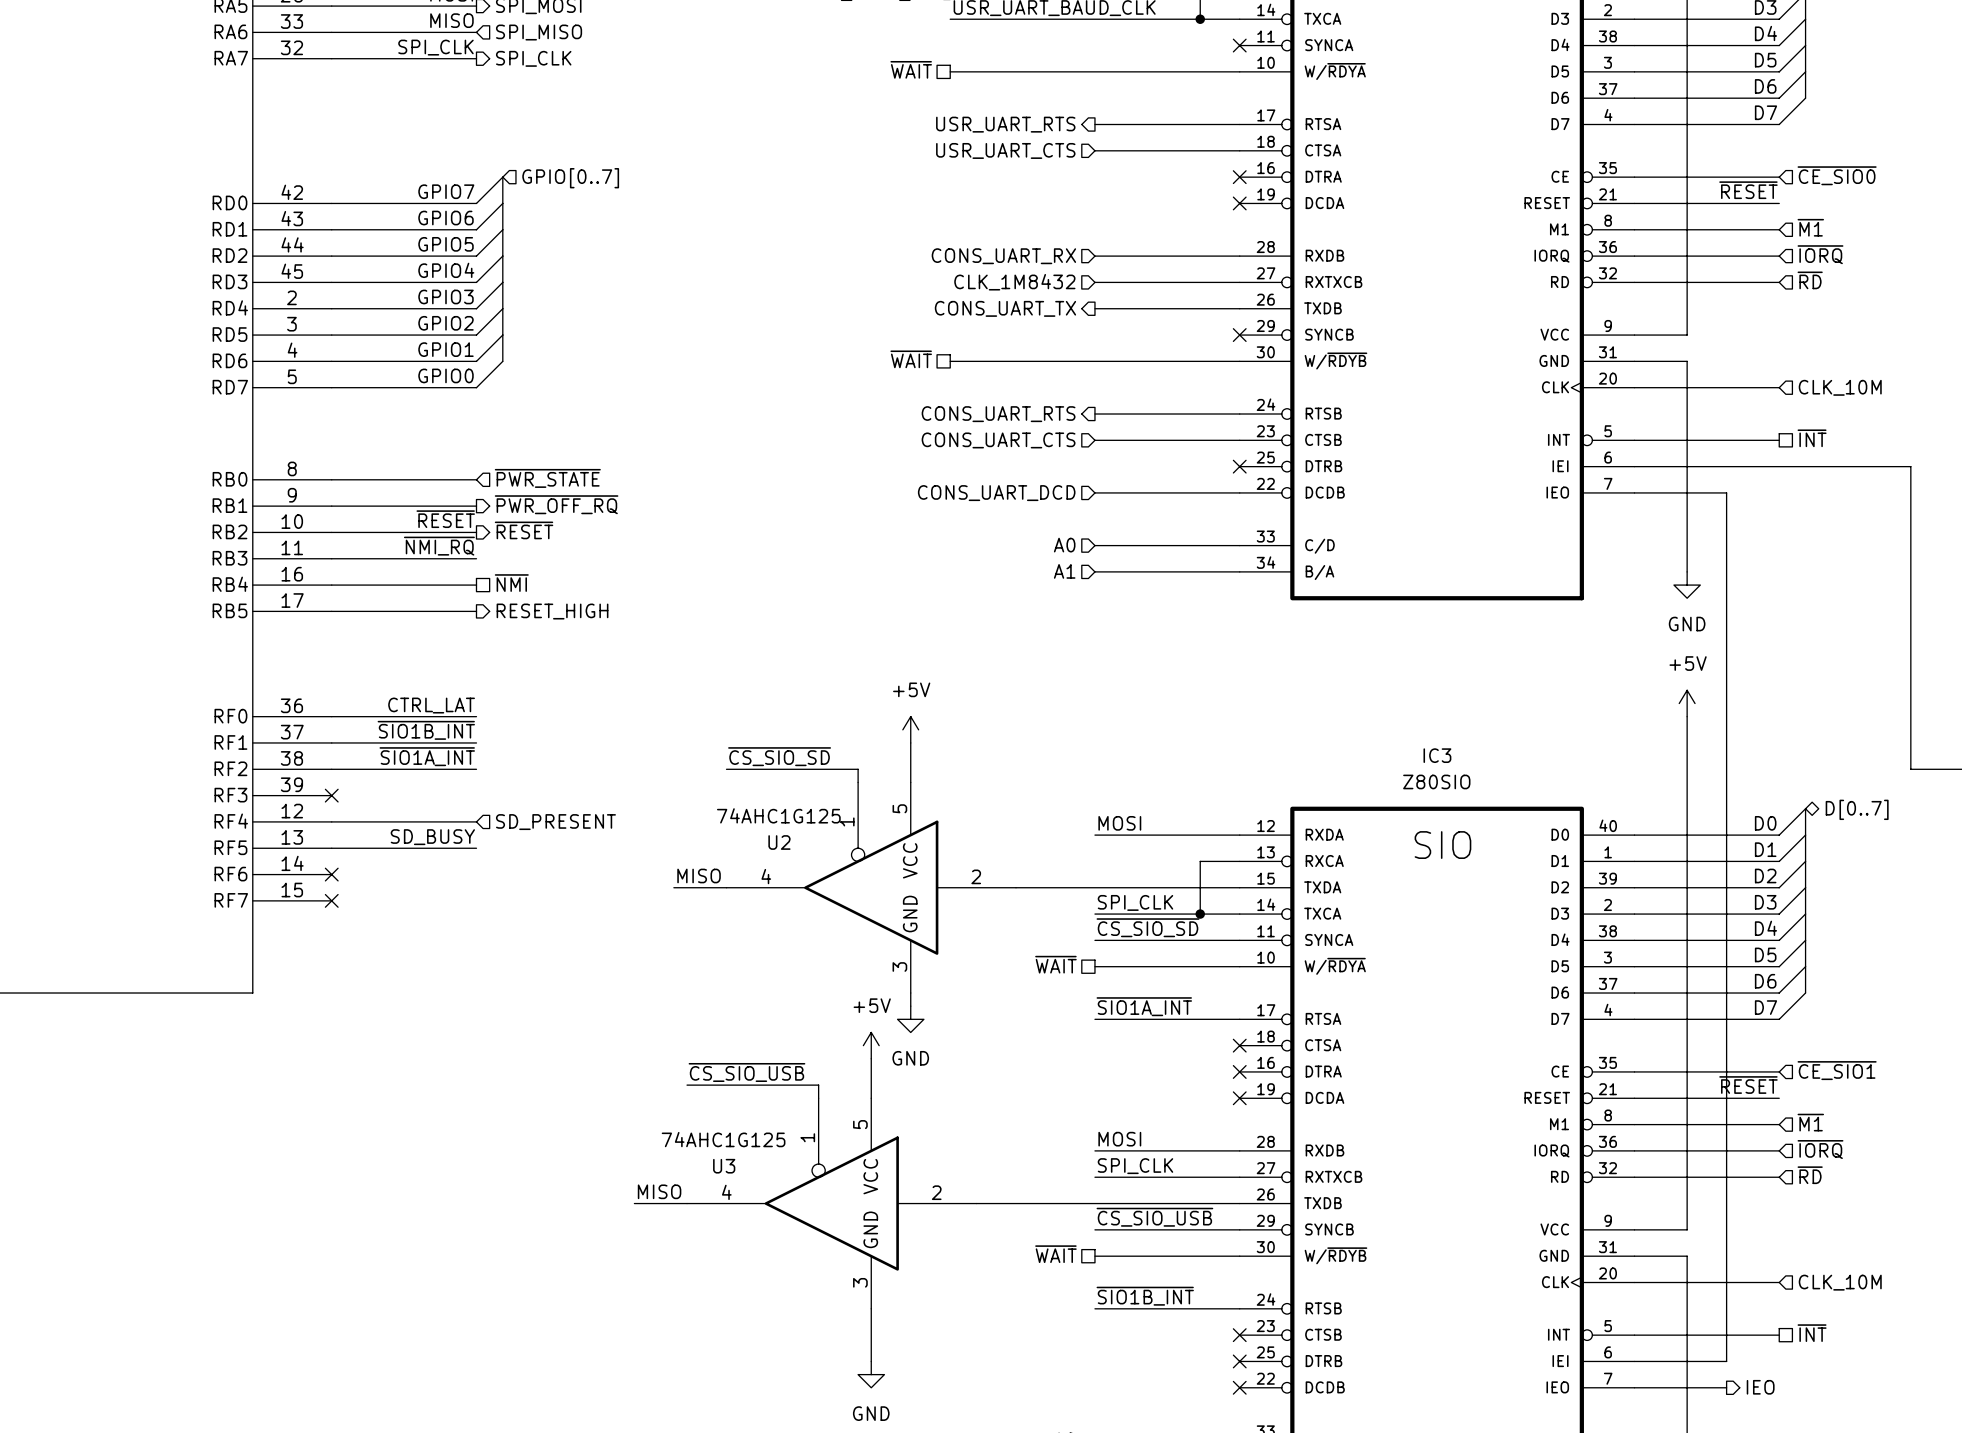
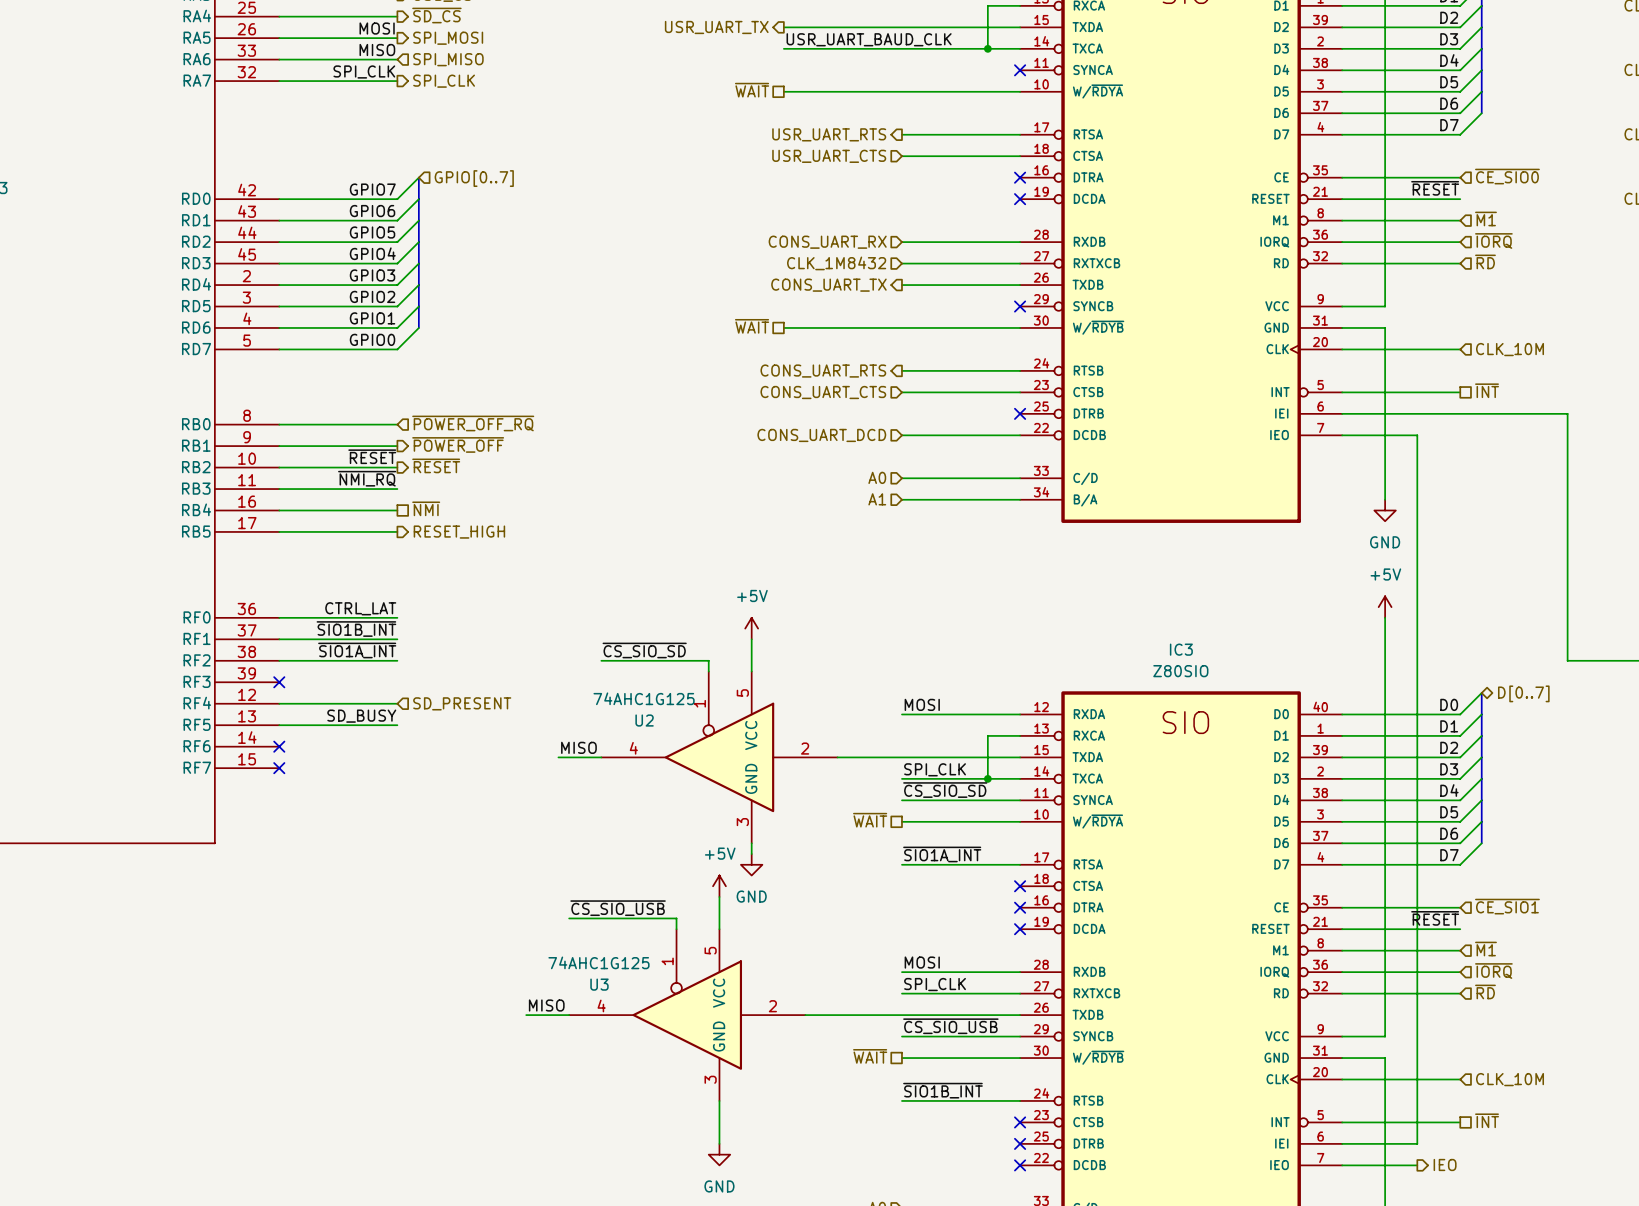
hierarchical label: ~{PWR_STATE} (547, 478) -> ~{POWER_OFF_RQ} (473, 423)
hierarchical label: ~{PWR_OFF_RQ} (556, 504) -> ~{POWER_OFF} (458, 444)

